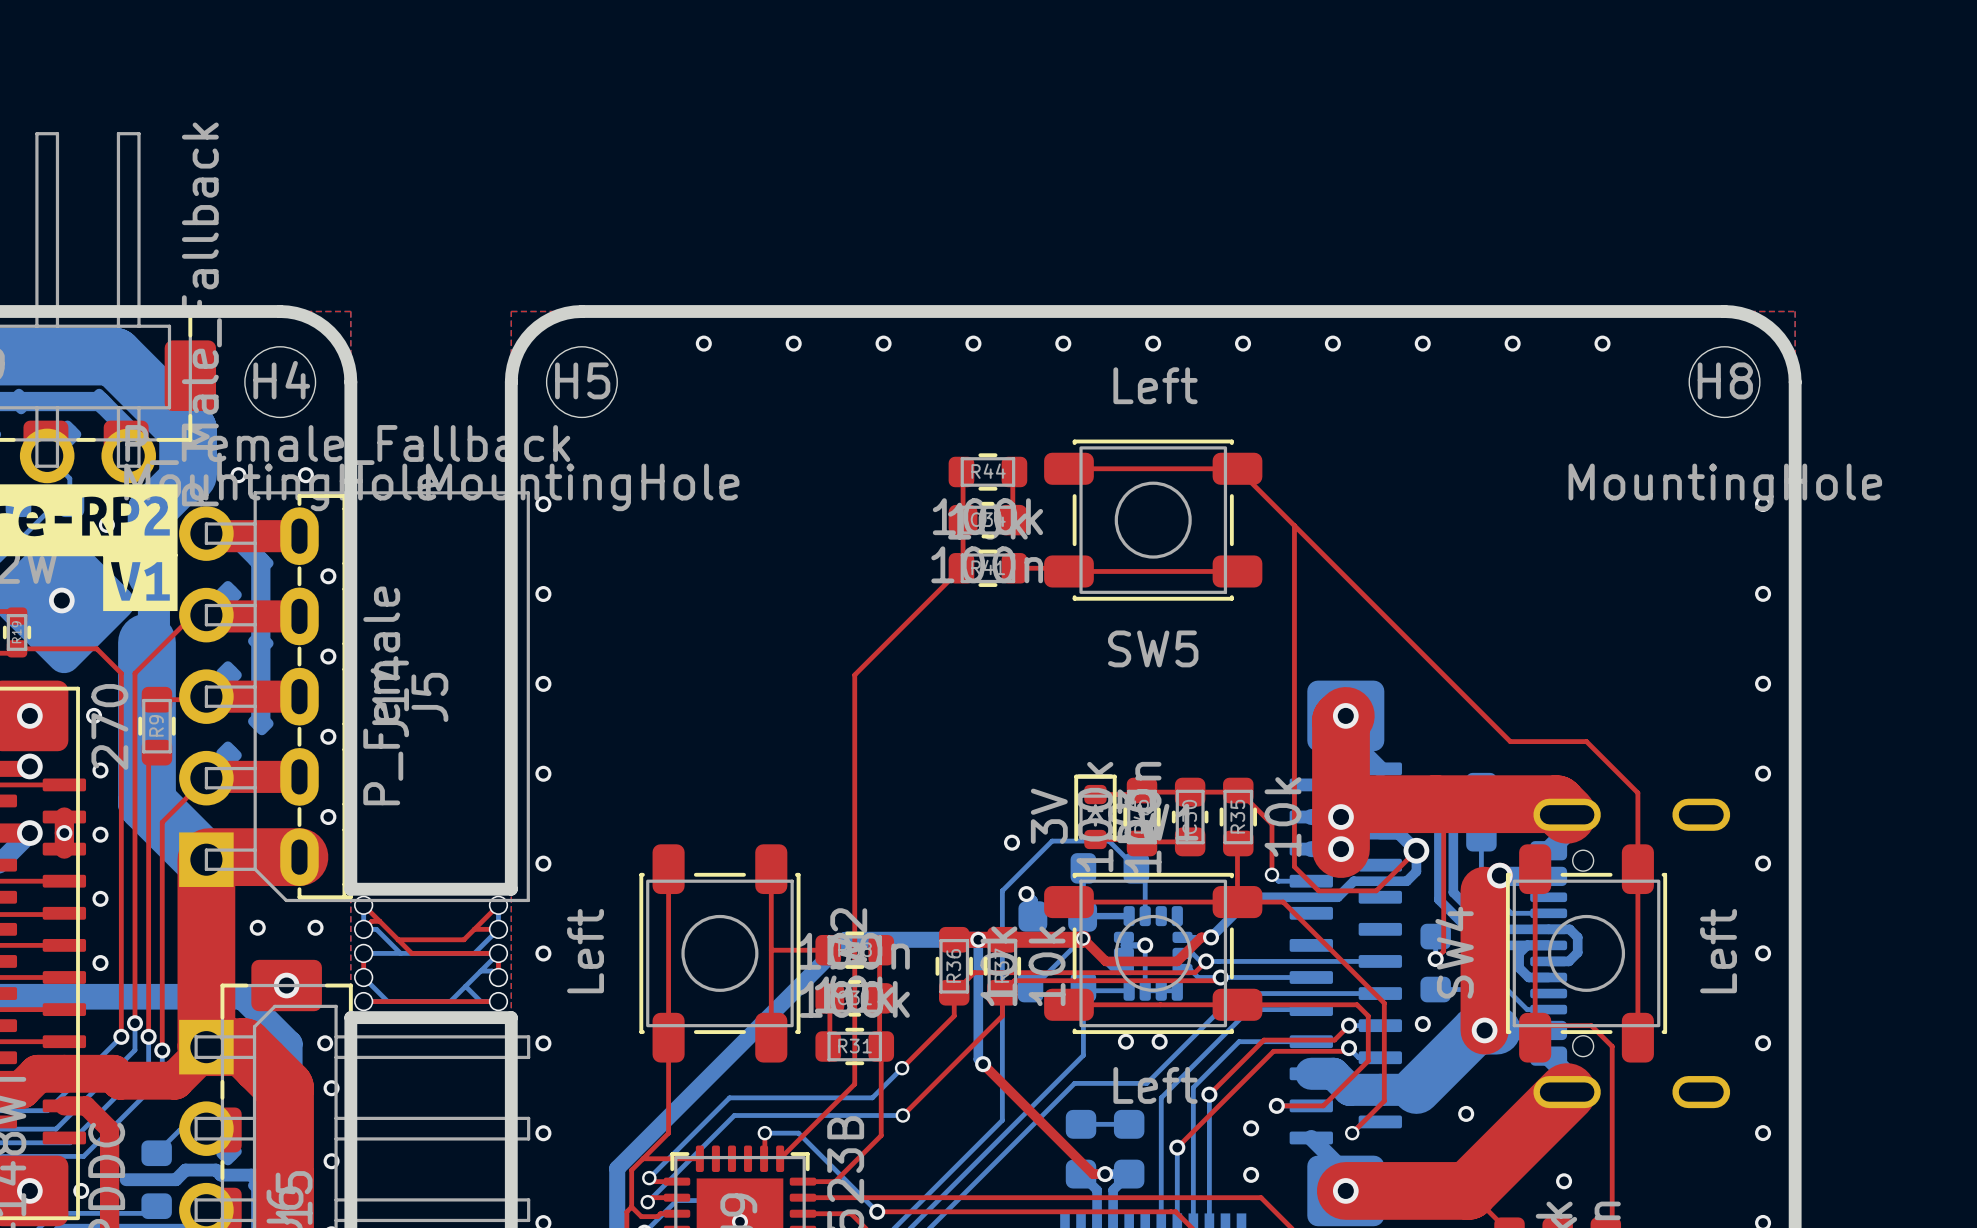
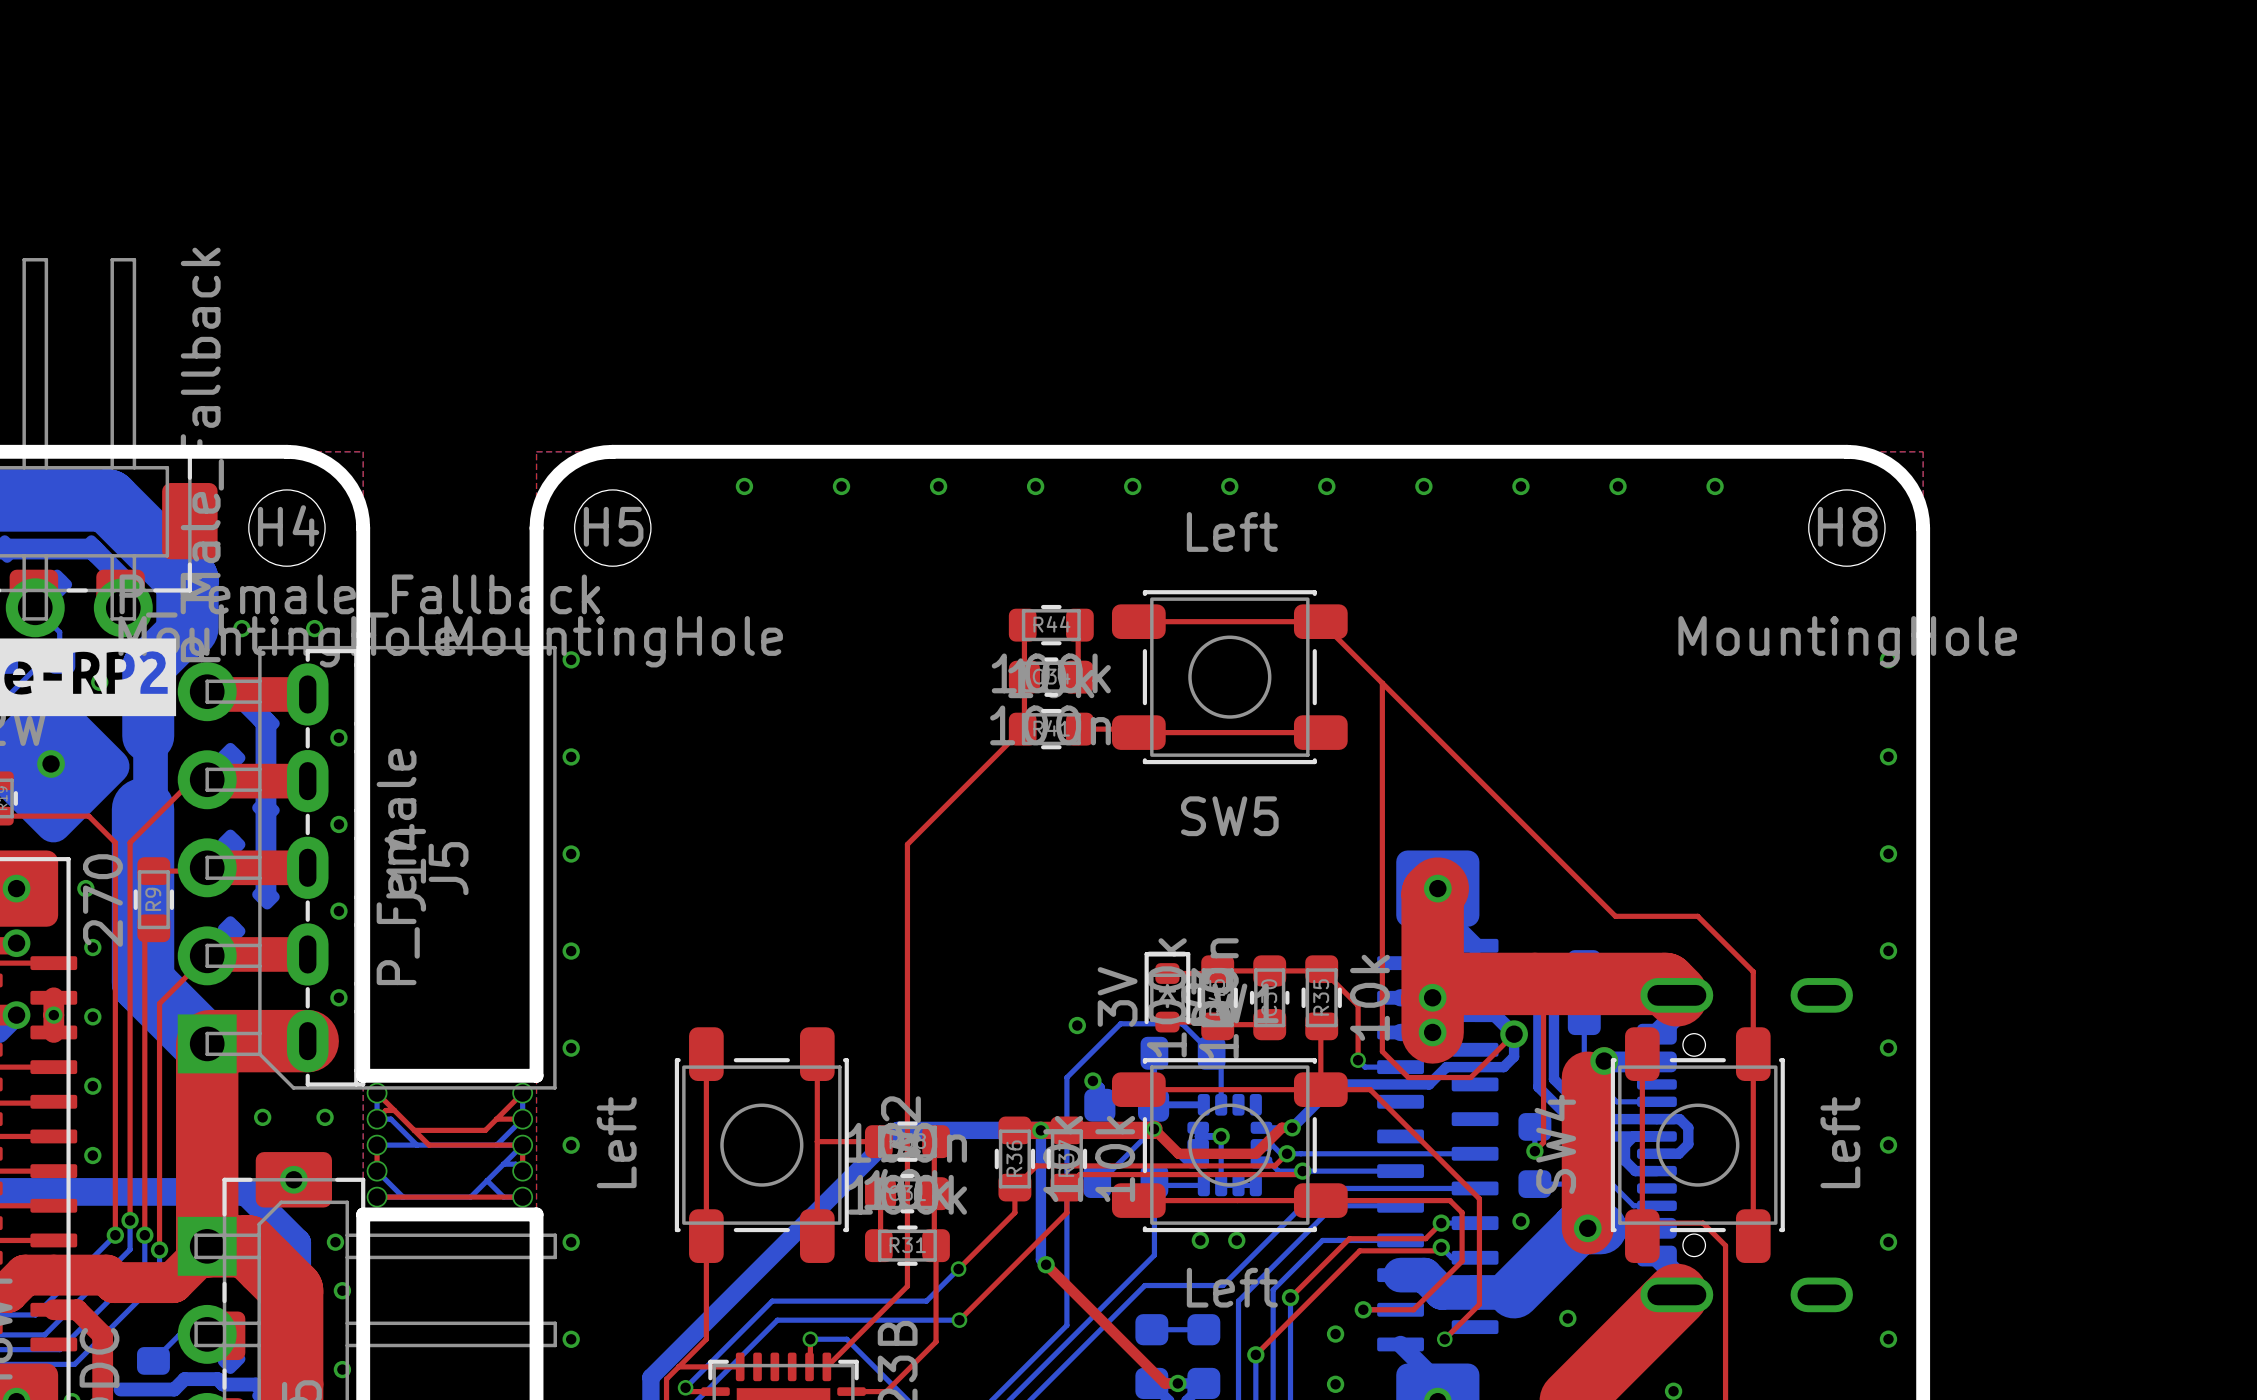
drawing: [103, 554, 178, 612] -> none

